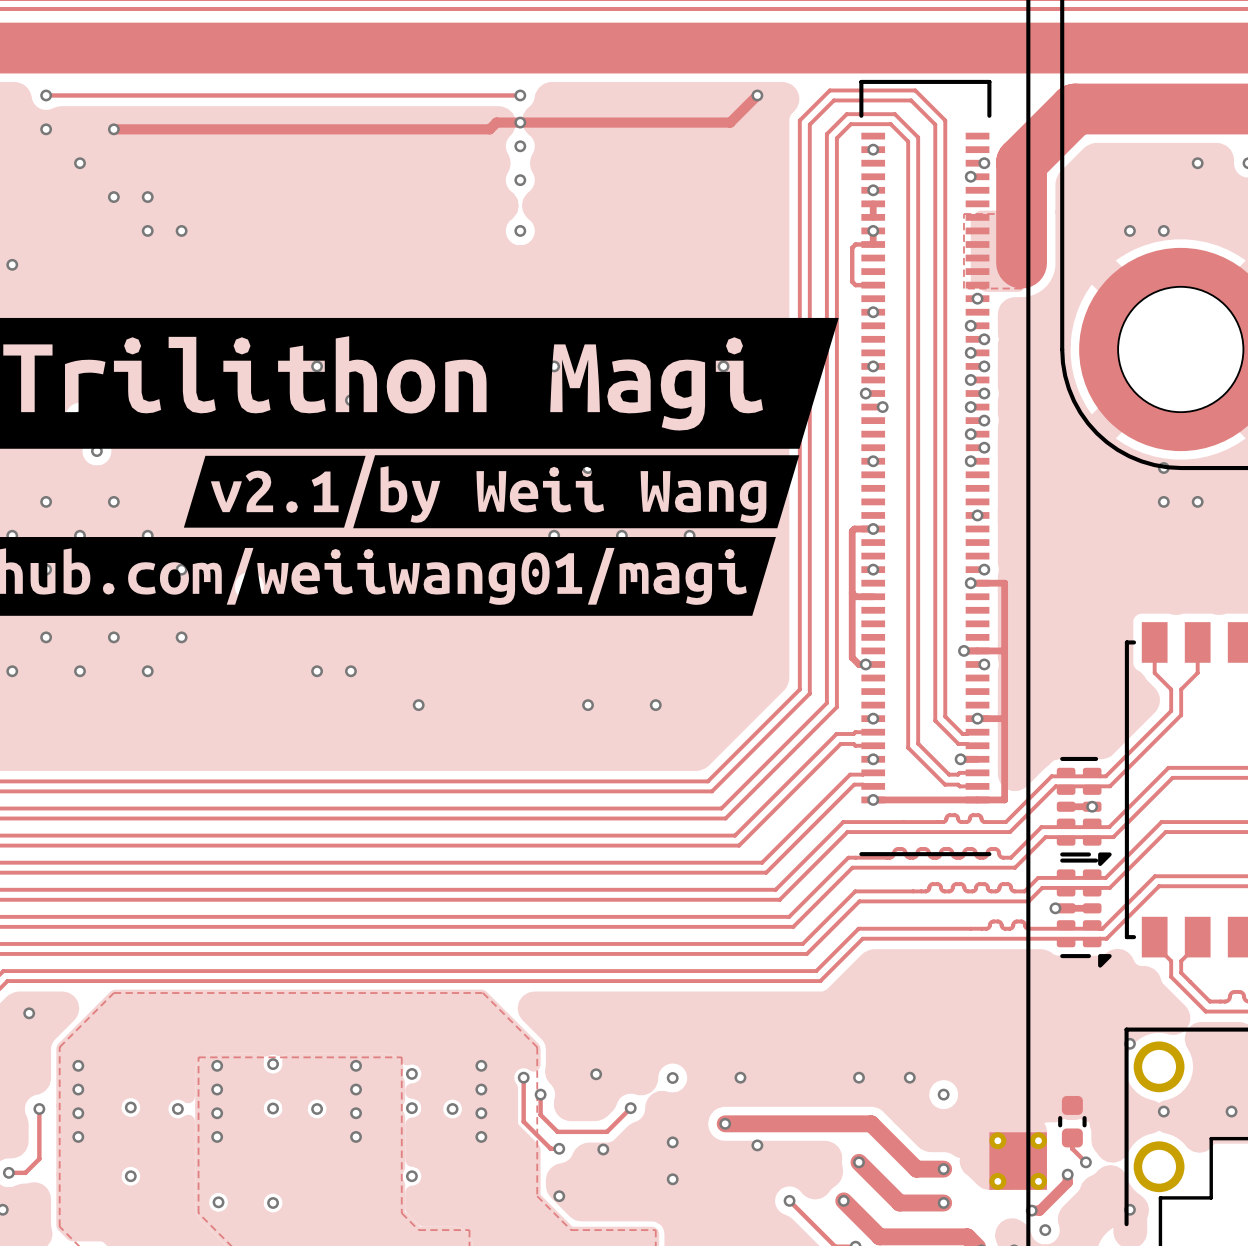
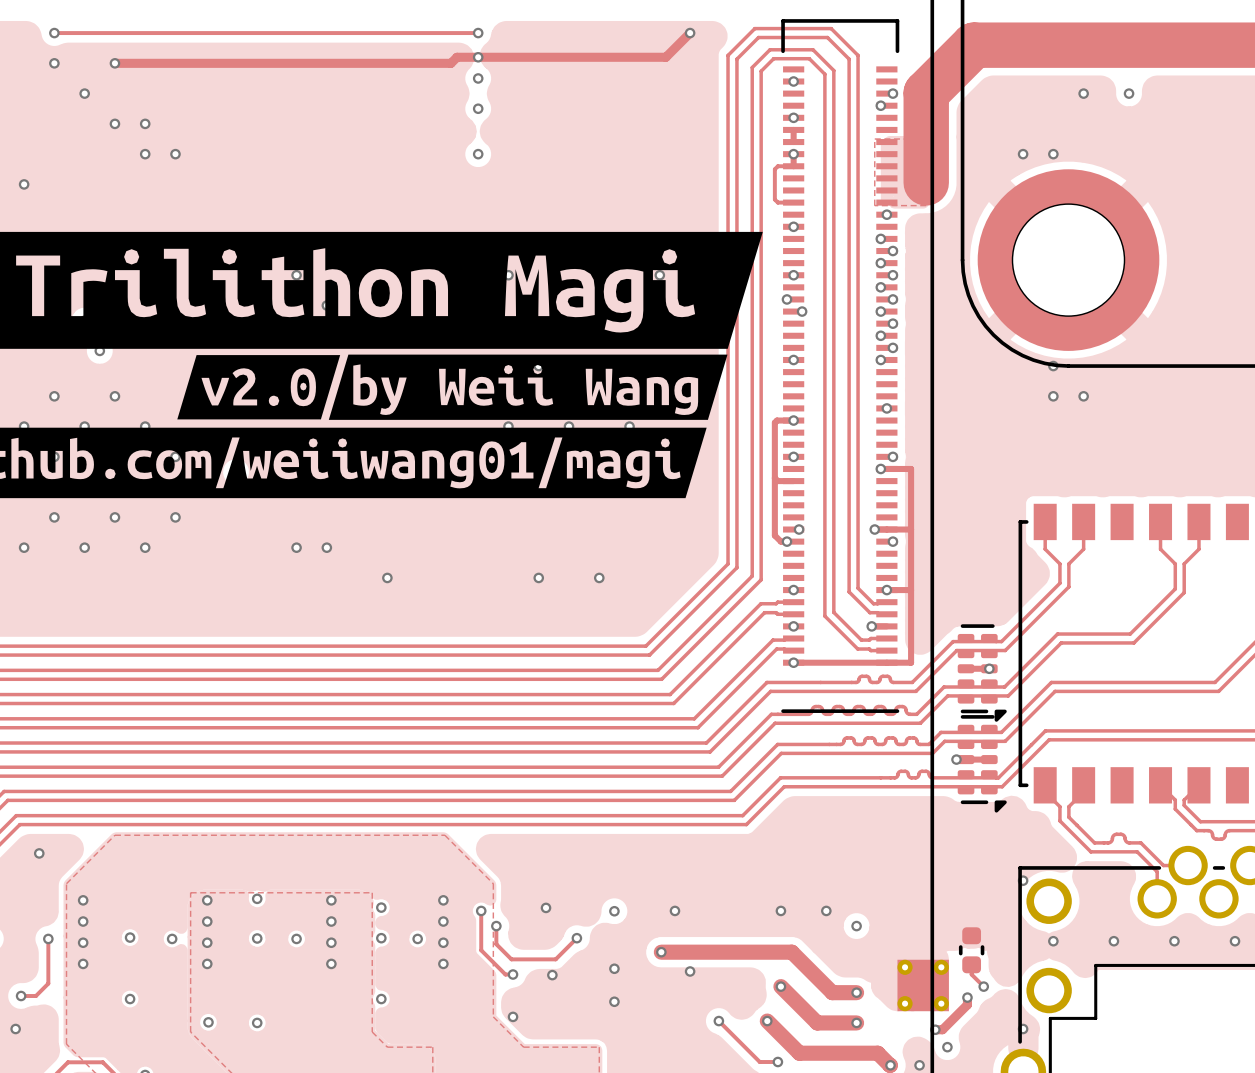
drawing shape: [183, 455, 366, 528] -> [177, 355, 341, 420]
via: none -> (799, 529)

